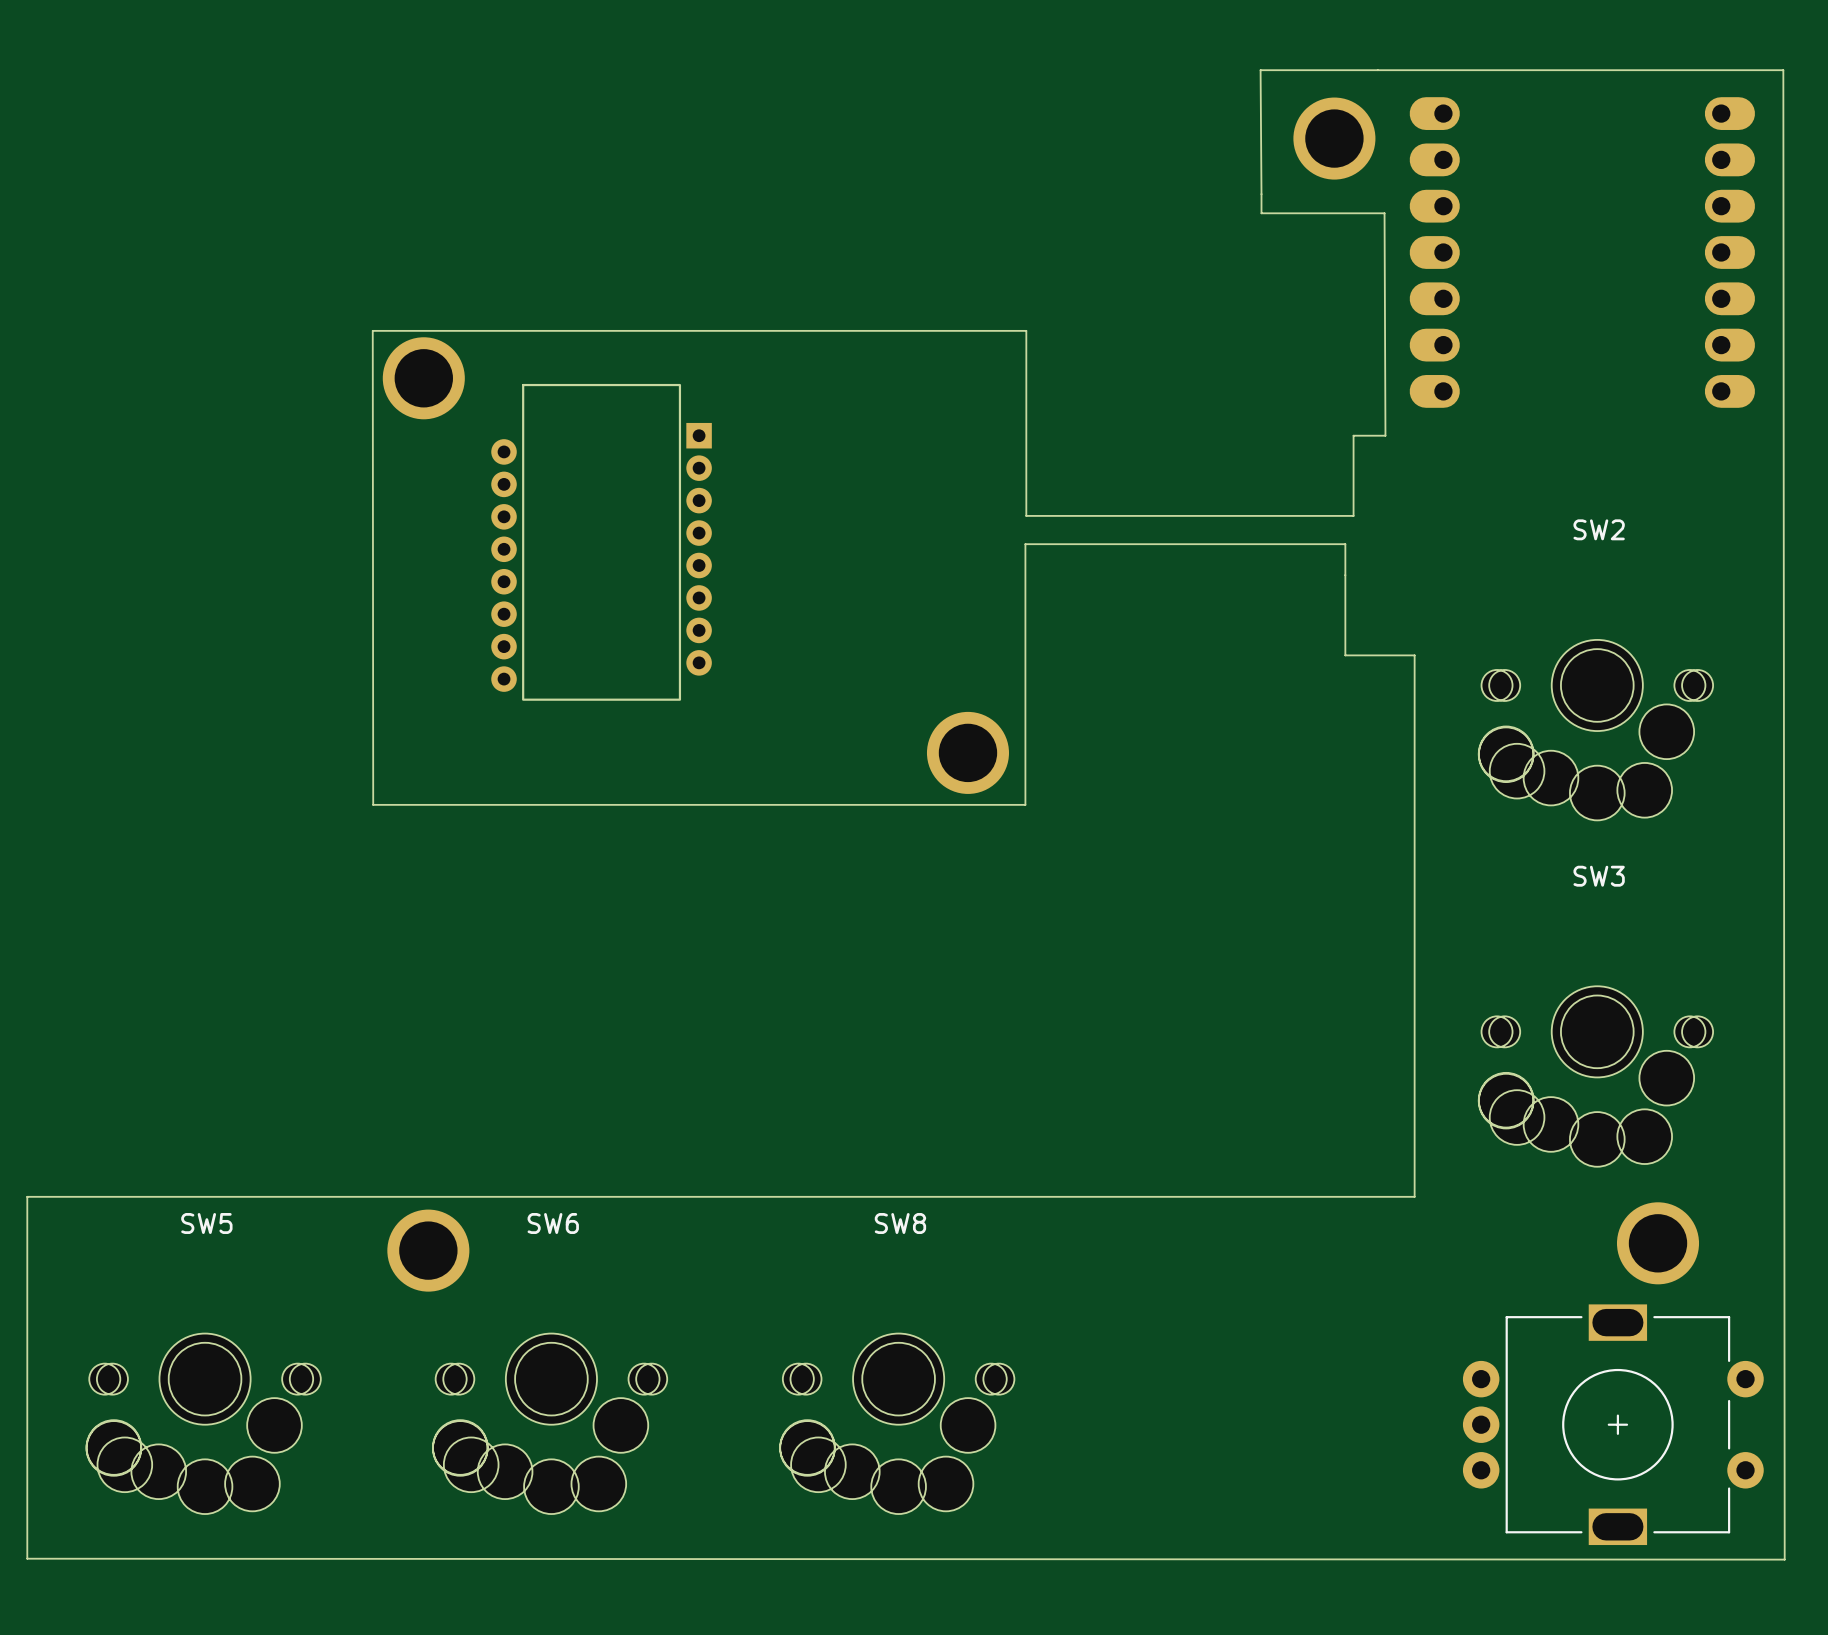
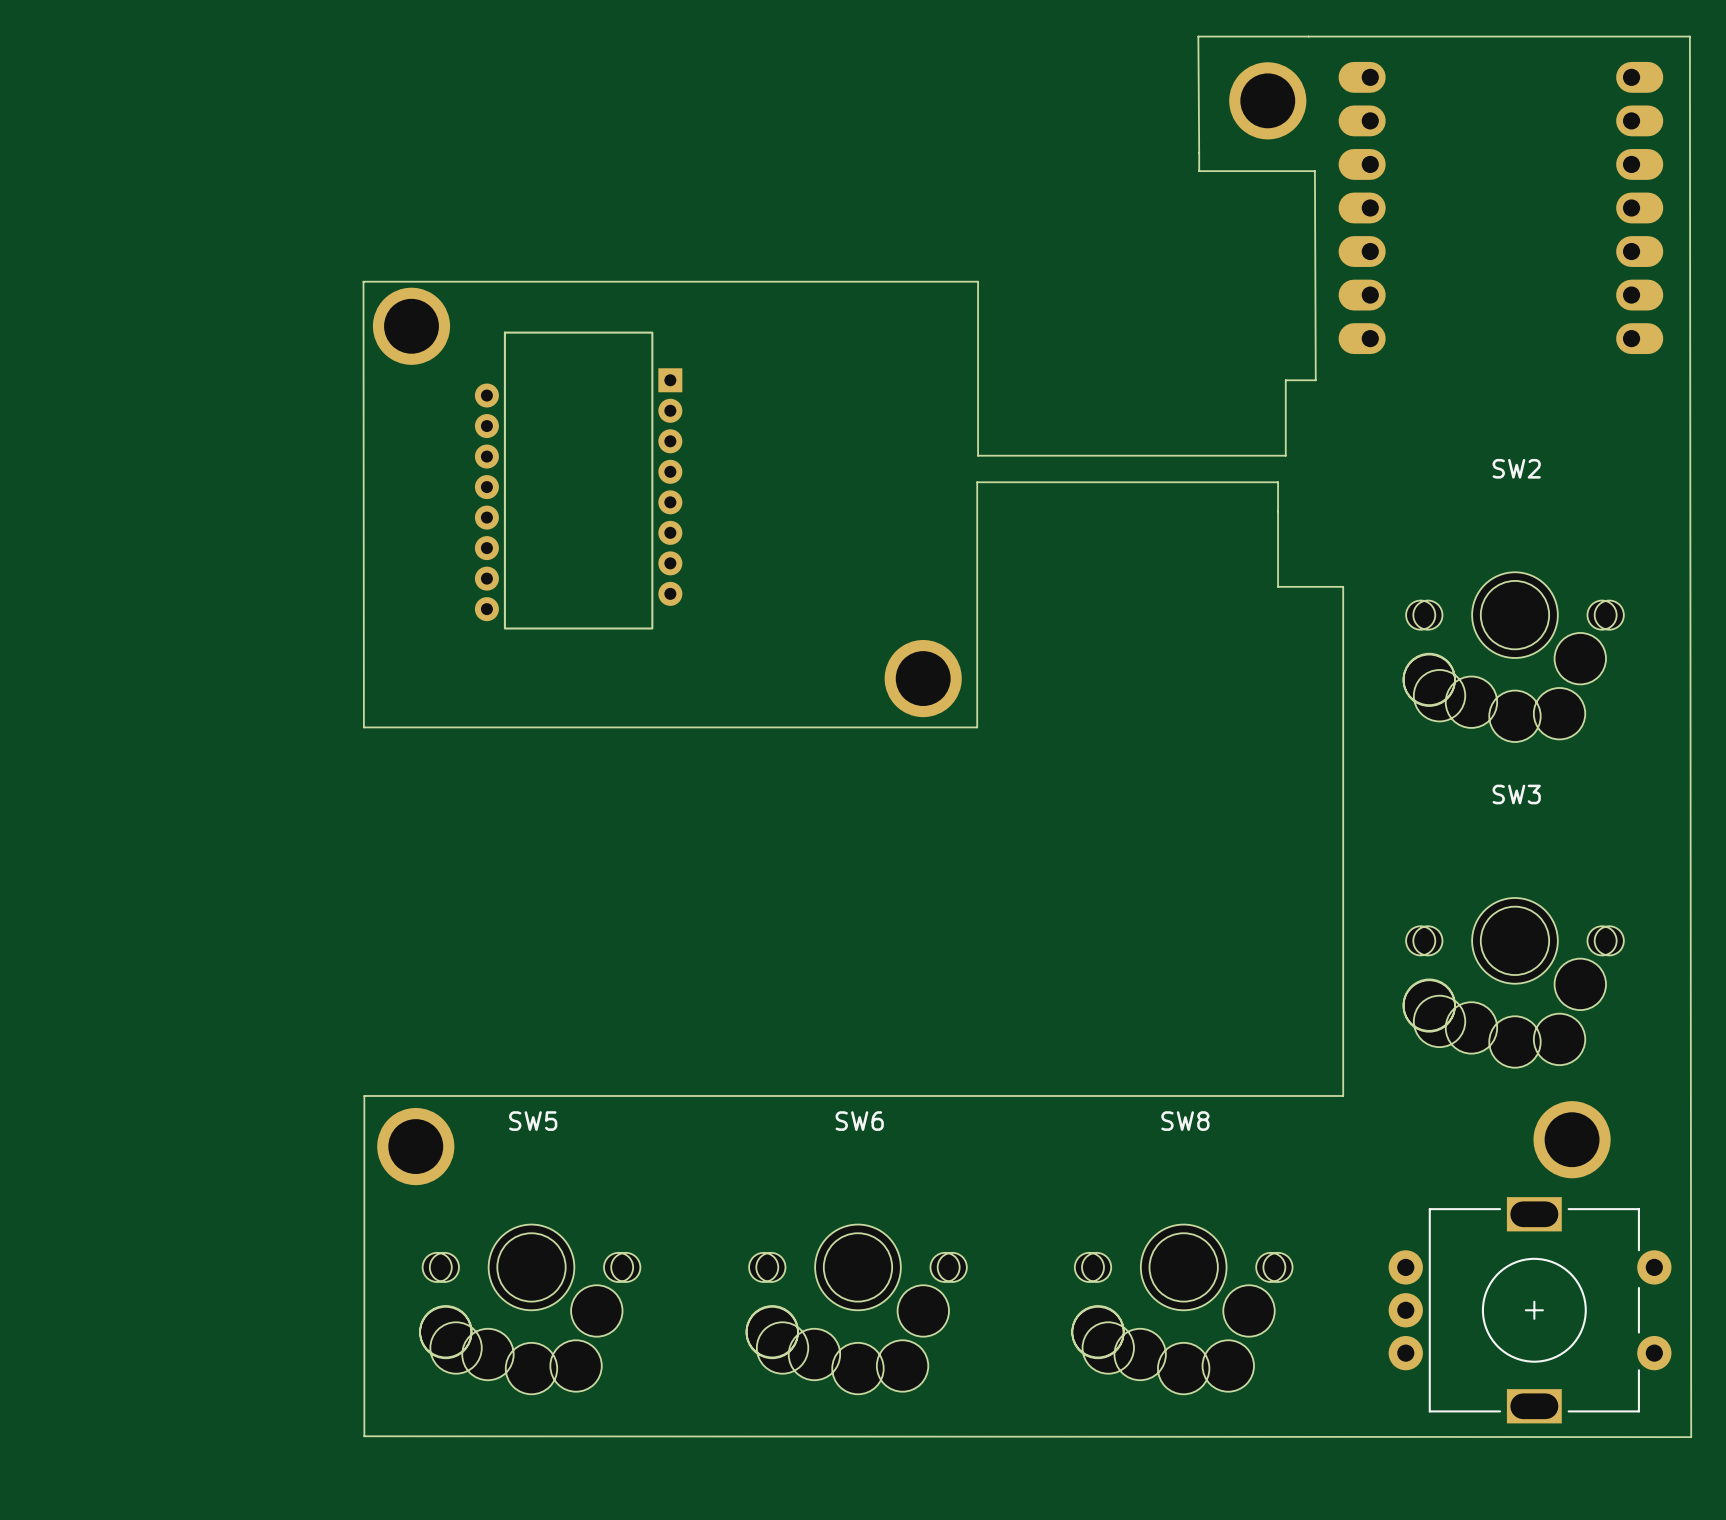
board edge: (373, 1196) (27, 1196) (27, 1558) (1784, 1559) -> (364, 1095) (364, 1436) (1691, 1437)
SW6 name: SW6 (553, 1223) -> SW5 (533, 1121)
SW8 name: SW8 (900, 1223) -> SW6 (859, 1121)
SW5: (203, 1423) -> none
SW8: none -> (1182, 1309)

